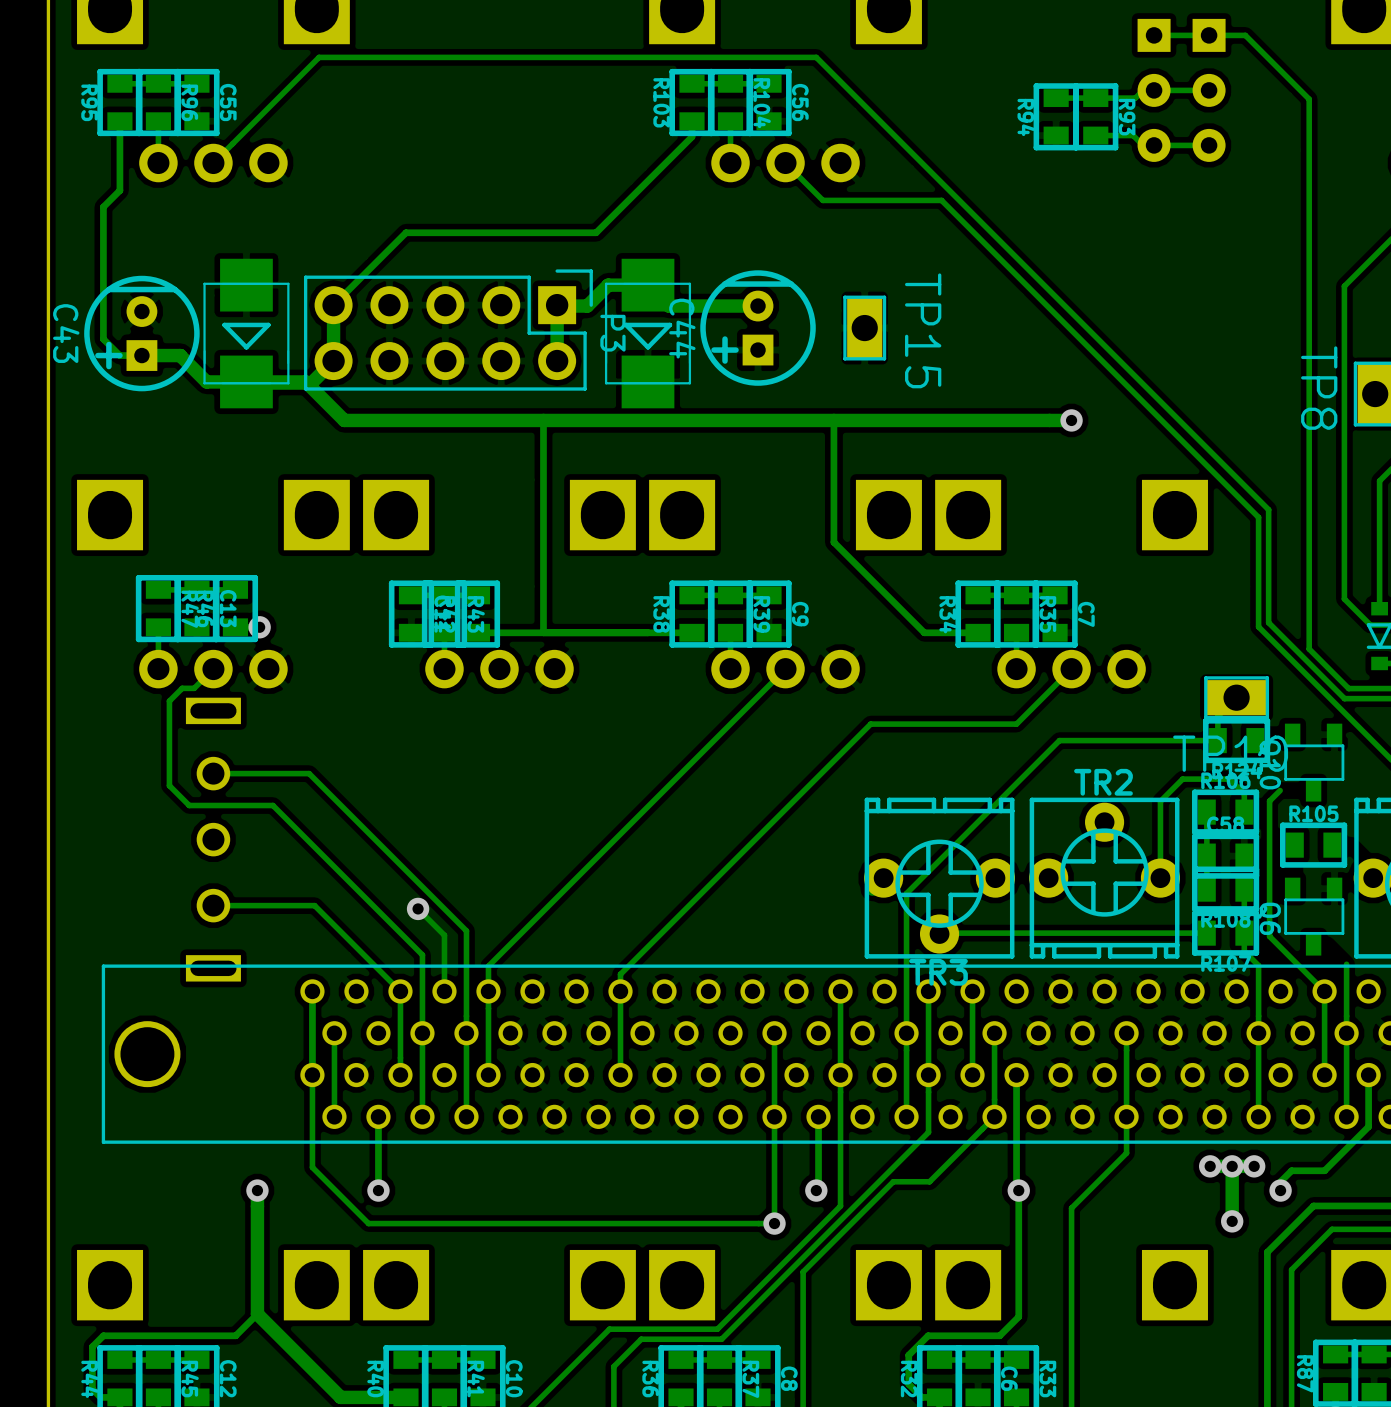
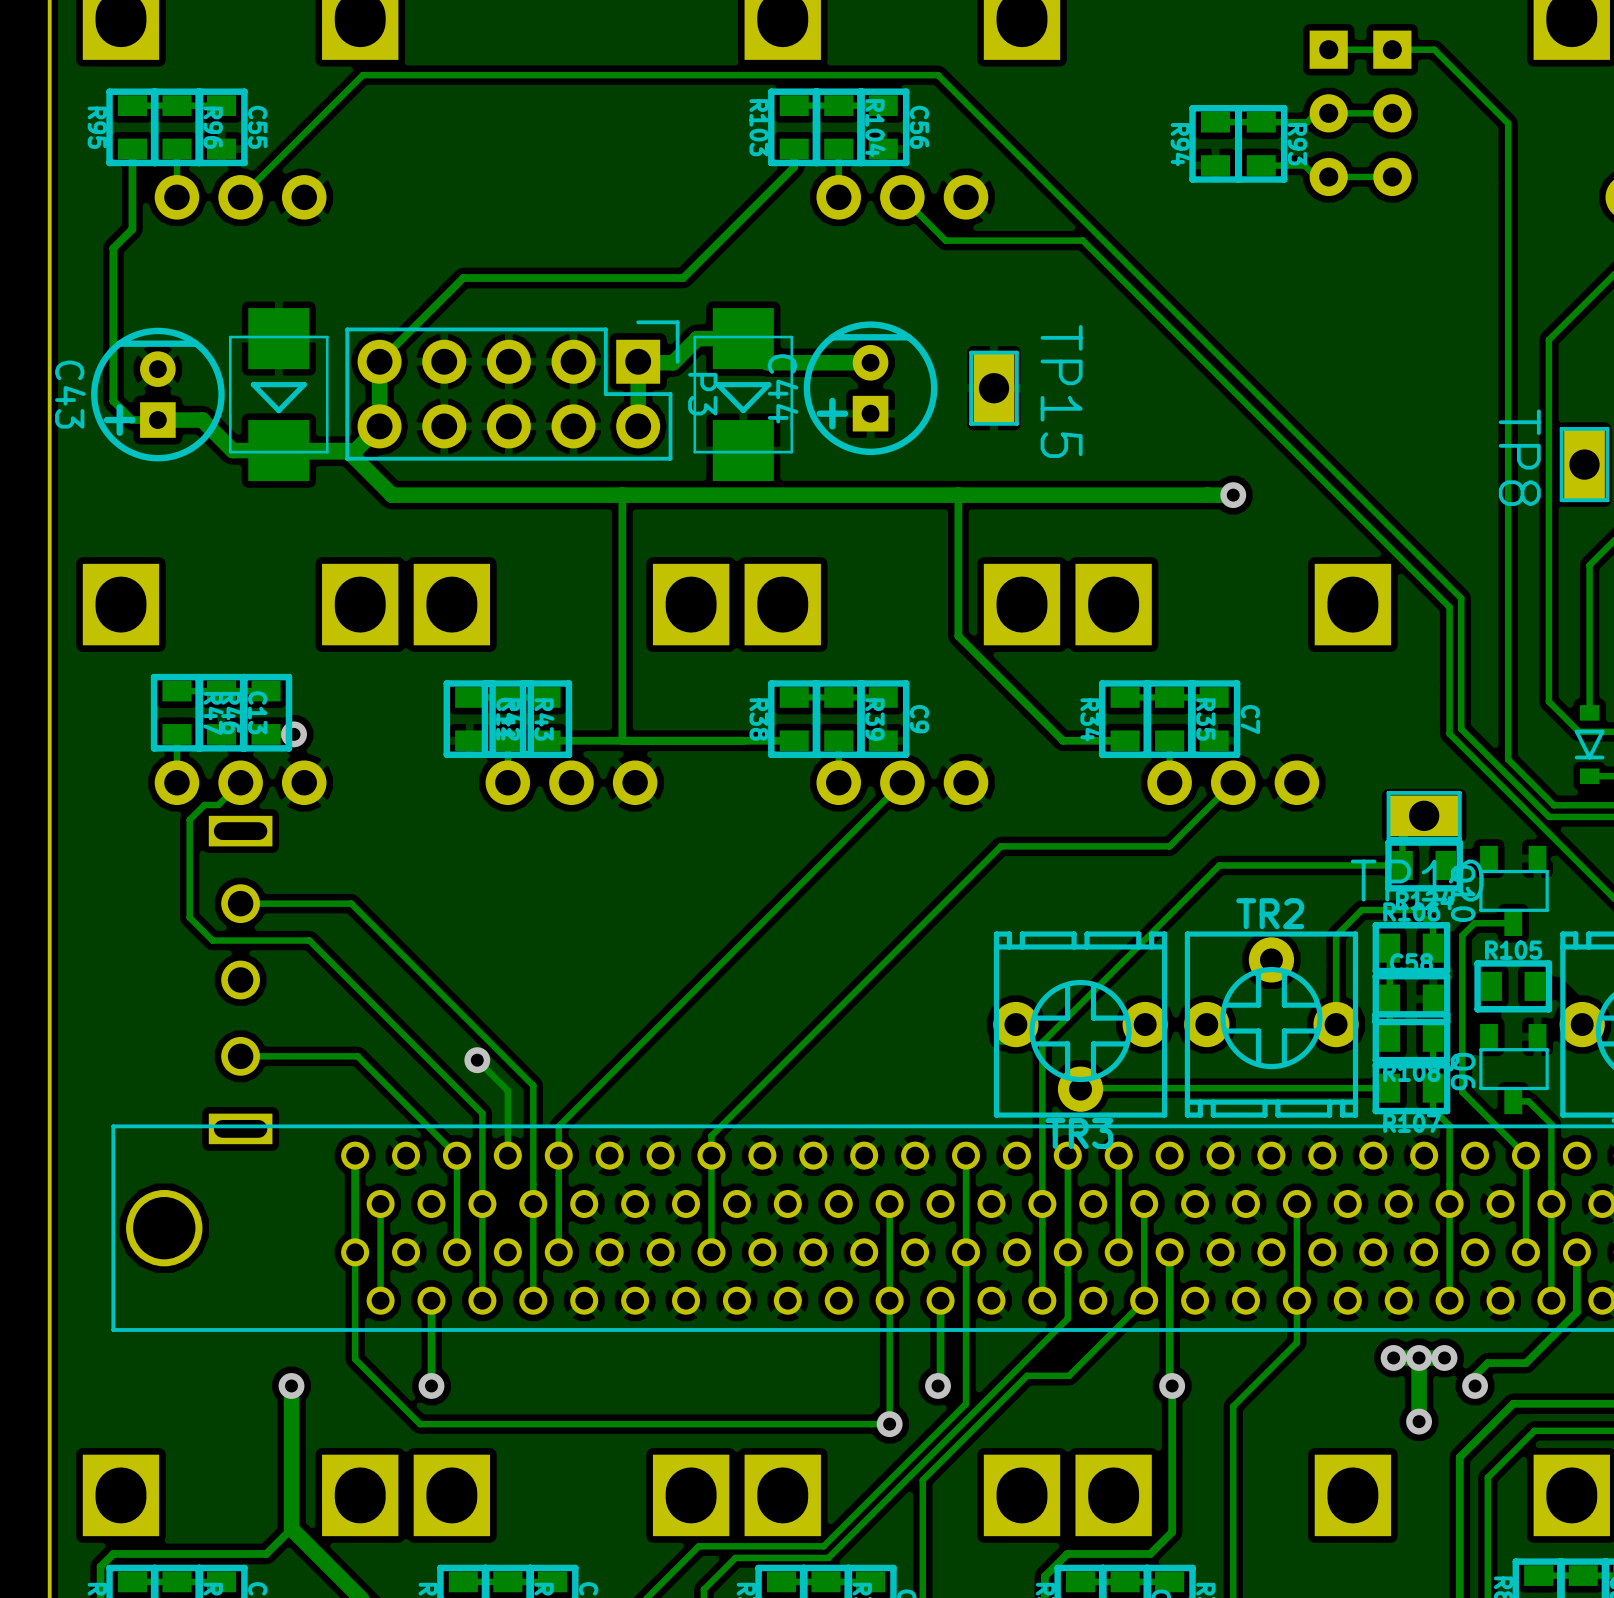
track: none -> (1513, 923) (1474, 923)
track: none -> (1513, 1101) (1528, 1101) (1551, 1124)

